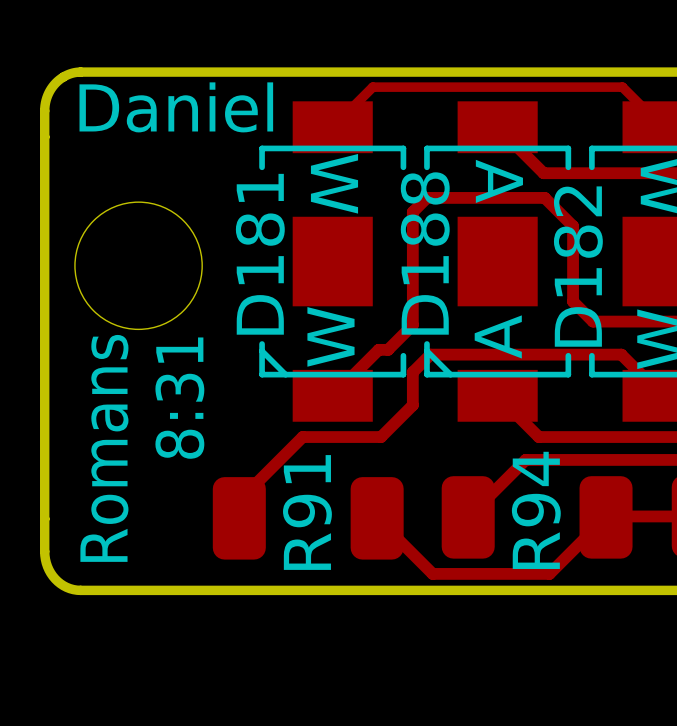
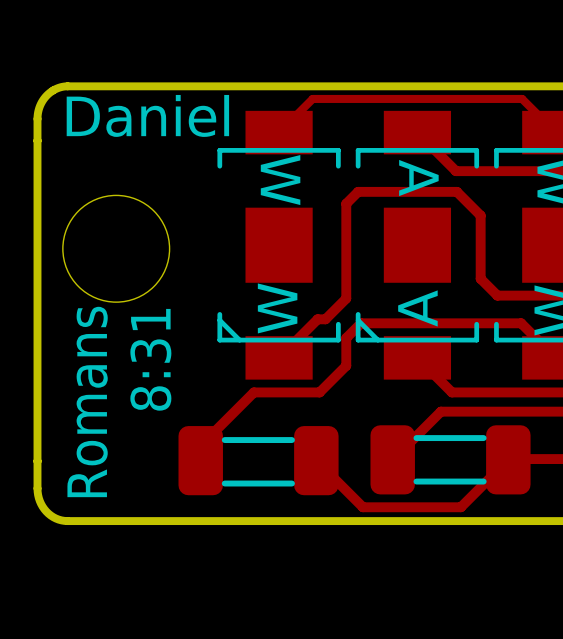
D188 name: D188 (425, 253) -> none
D181 name: D181 (260, 254) -> none
D182 name: D182 (578, 266) -> none
line: none -> (416, 438) (483, 438)
line: none -> (224, 440) (291, 440)
R94 name: R94 (536, 510) -> none
R91 name: R91 (307, 512) -> none
line: none -> (416, 481) (483, 481)
line: none -> (224, 483) (291, 483)

